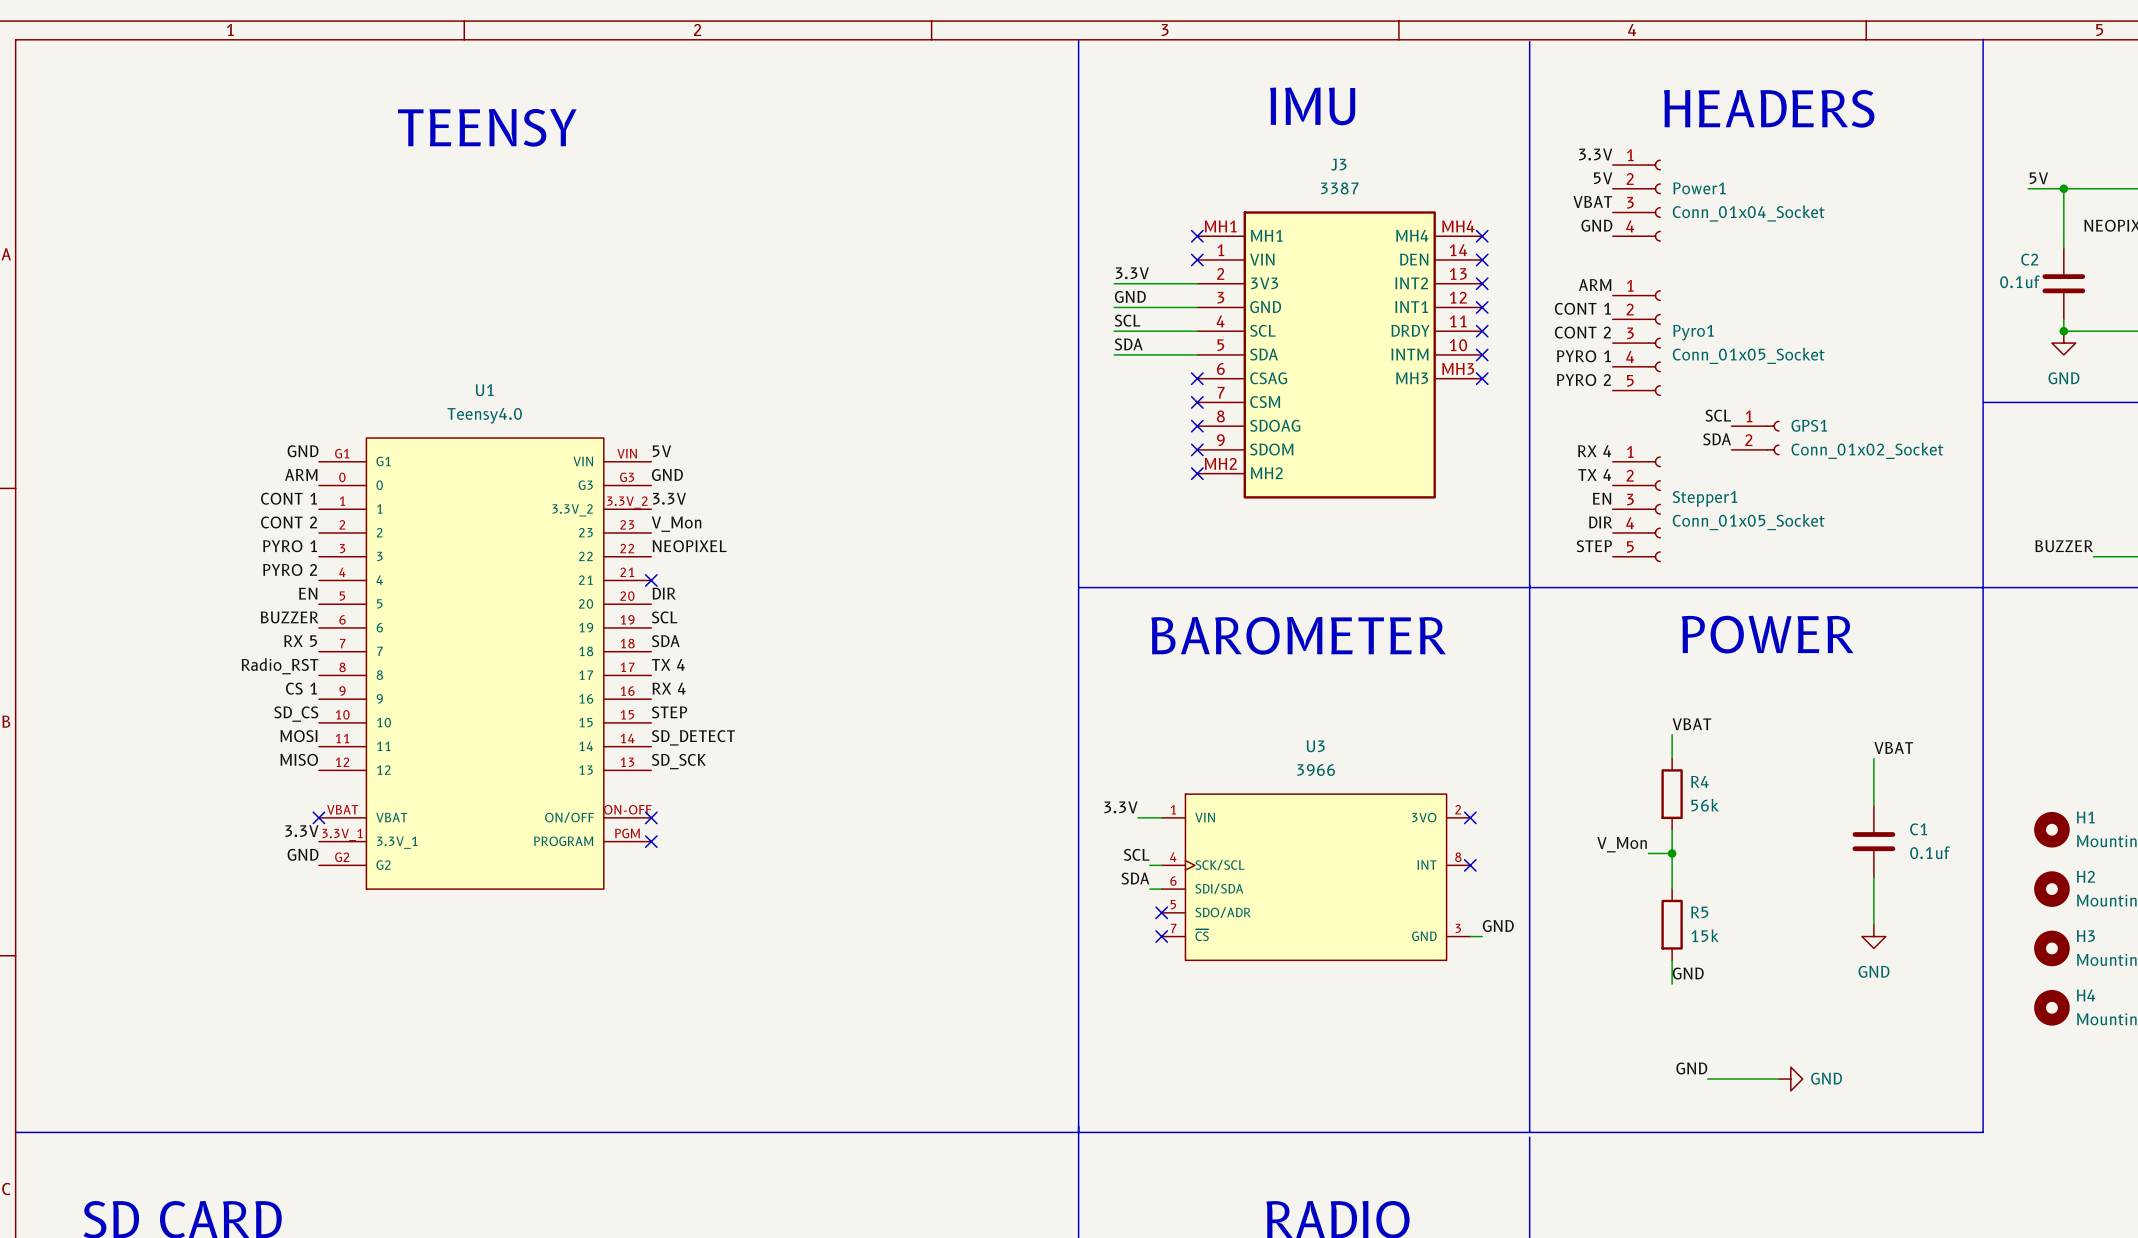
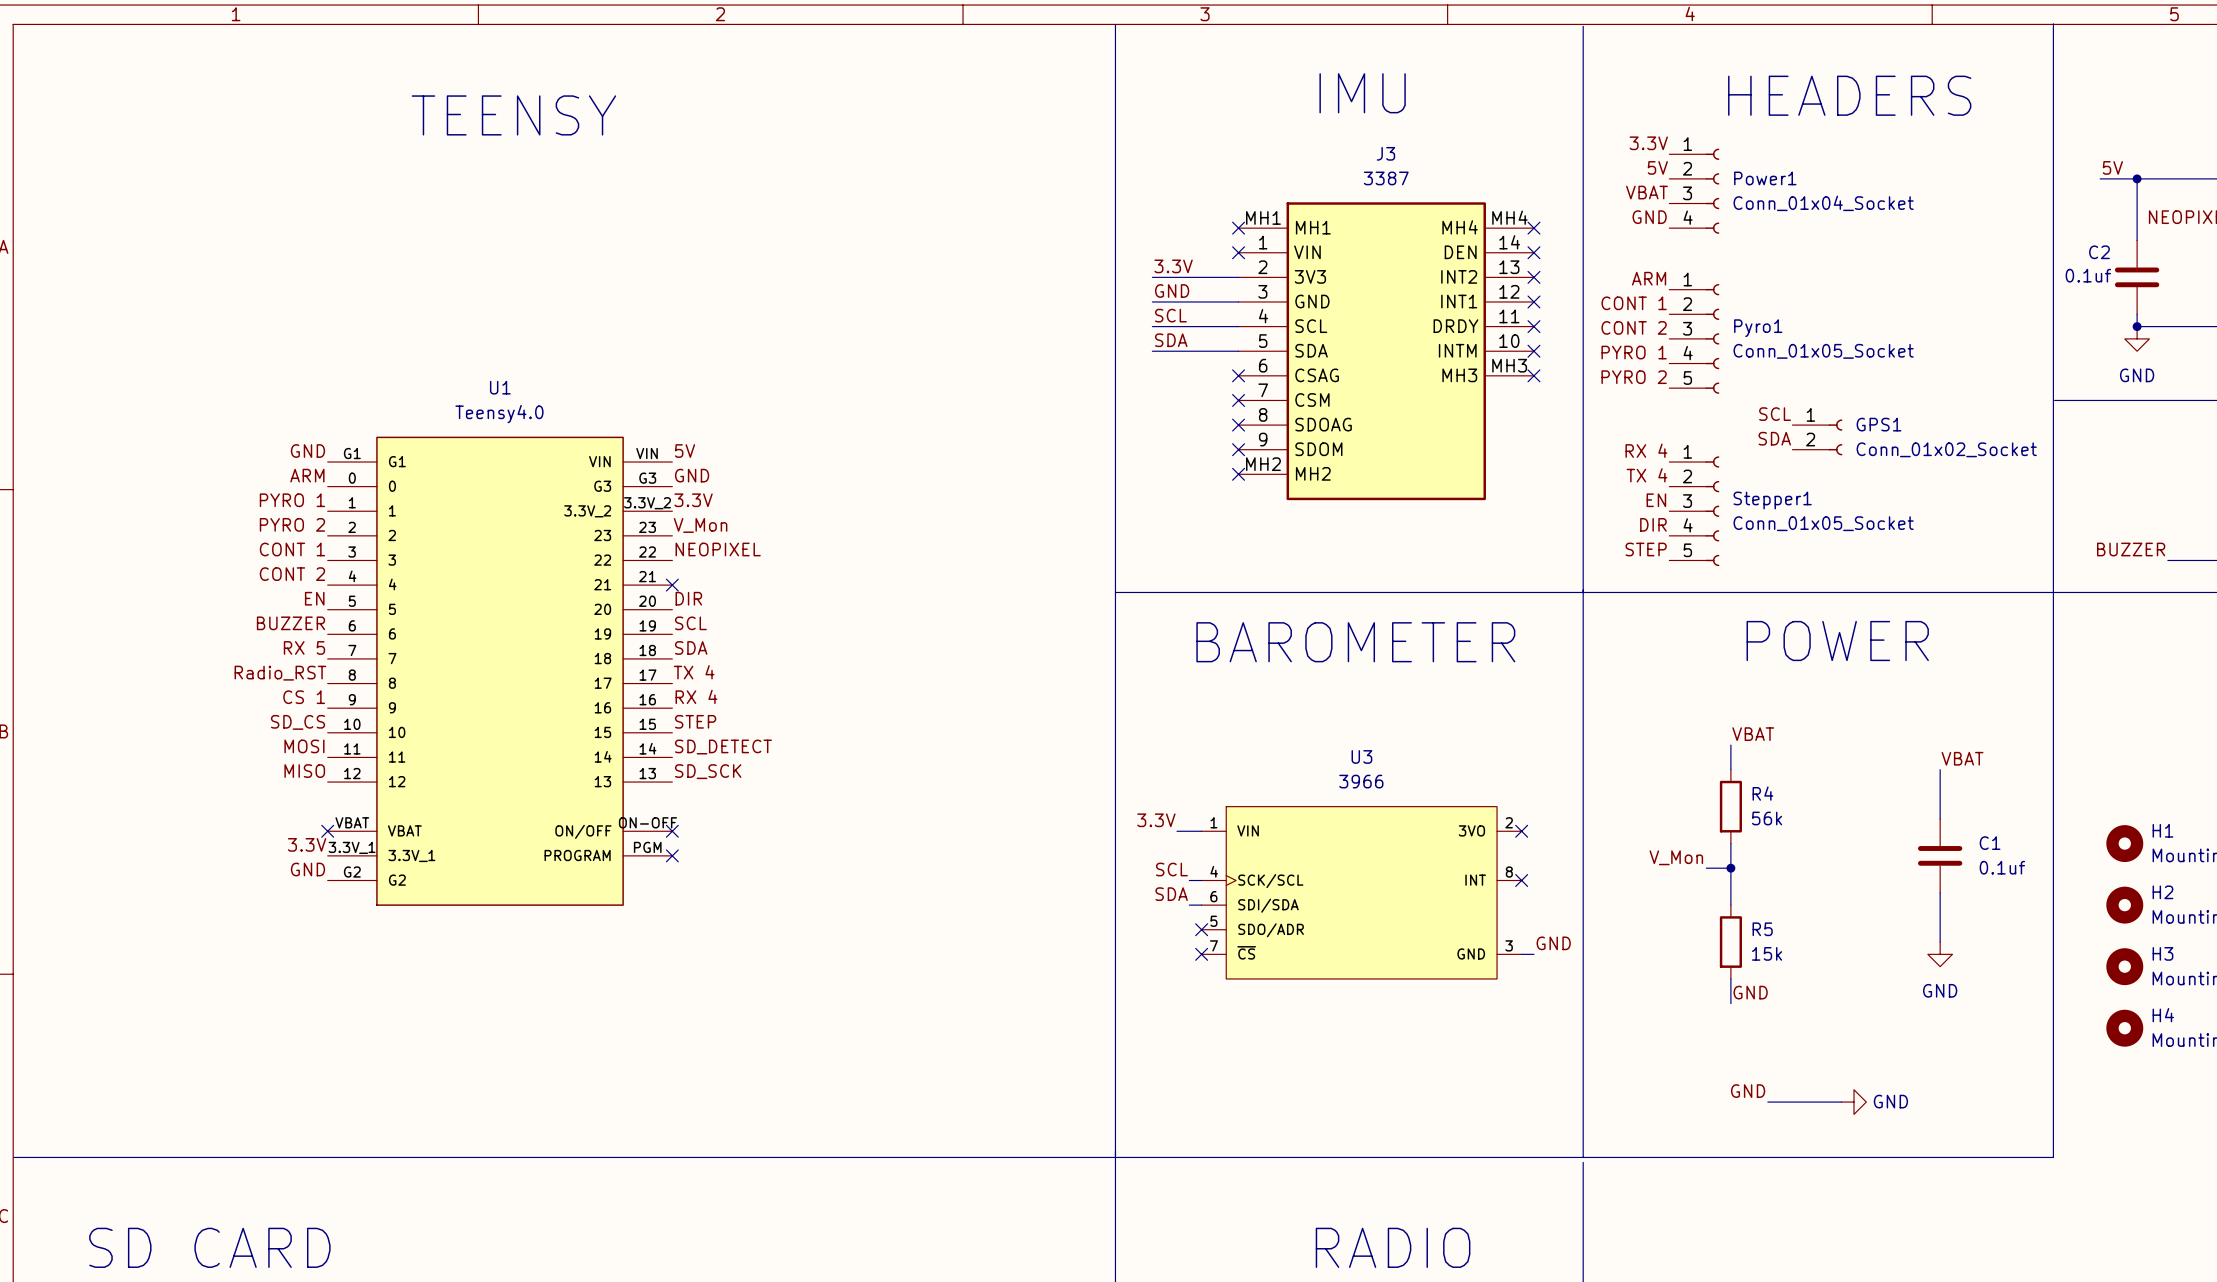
label: CONT 1 (289, 498) -> PYRO 1 (292, 500)
label: CONT 2 (289, 522) -> PYRO 2 (292, 524)
label: PYRO 1 (290, 546) -> CONT 1 (292, 549)
label: PYRO 2 (290, 569) -> CONT 2 (292, 574)

